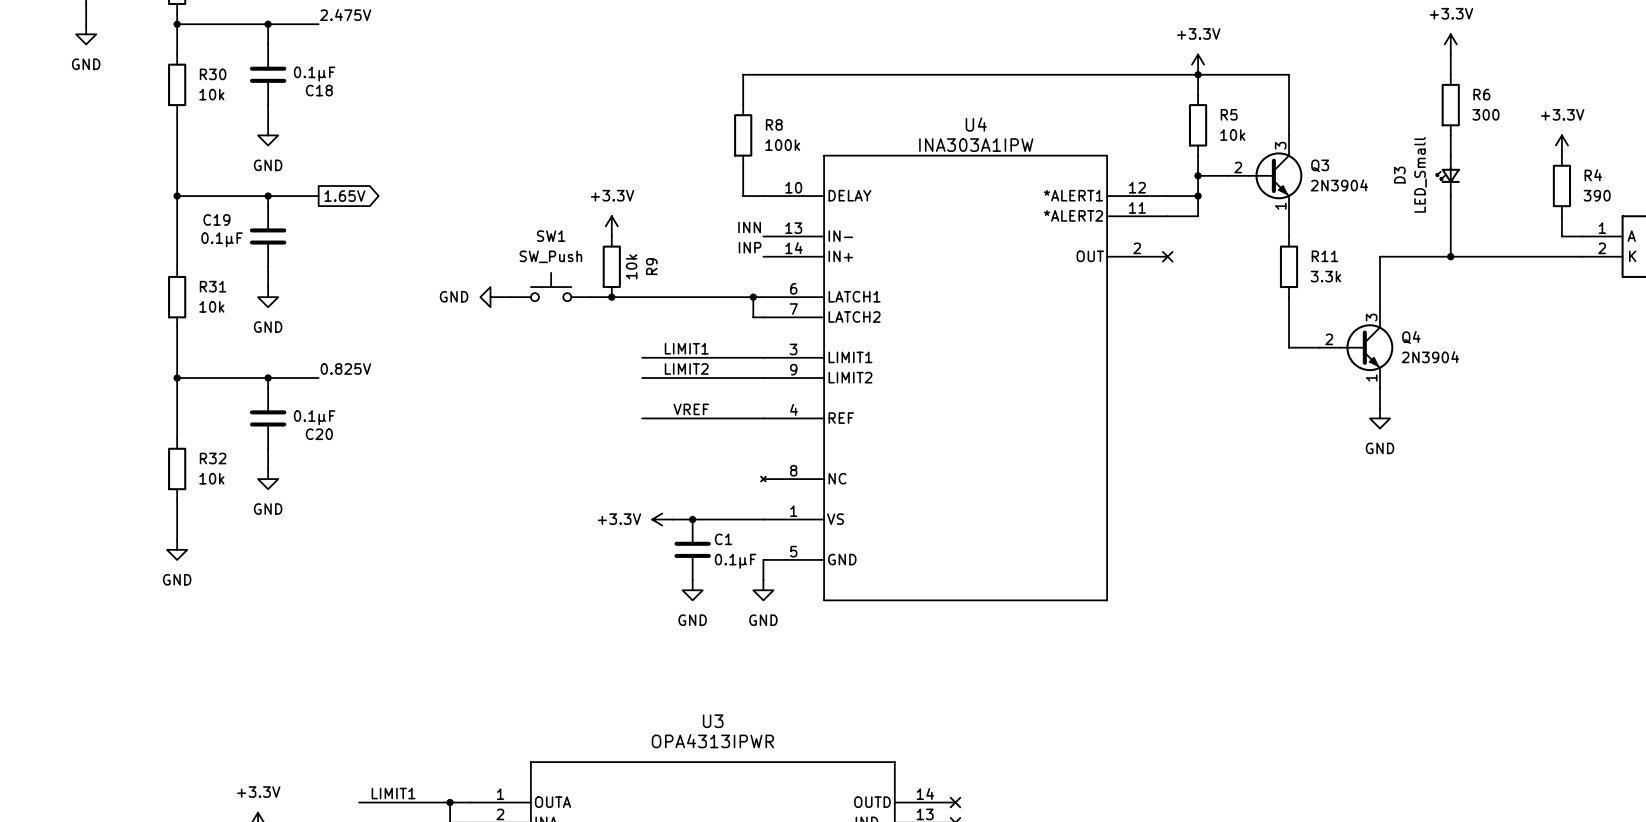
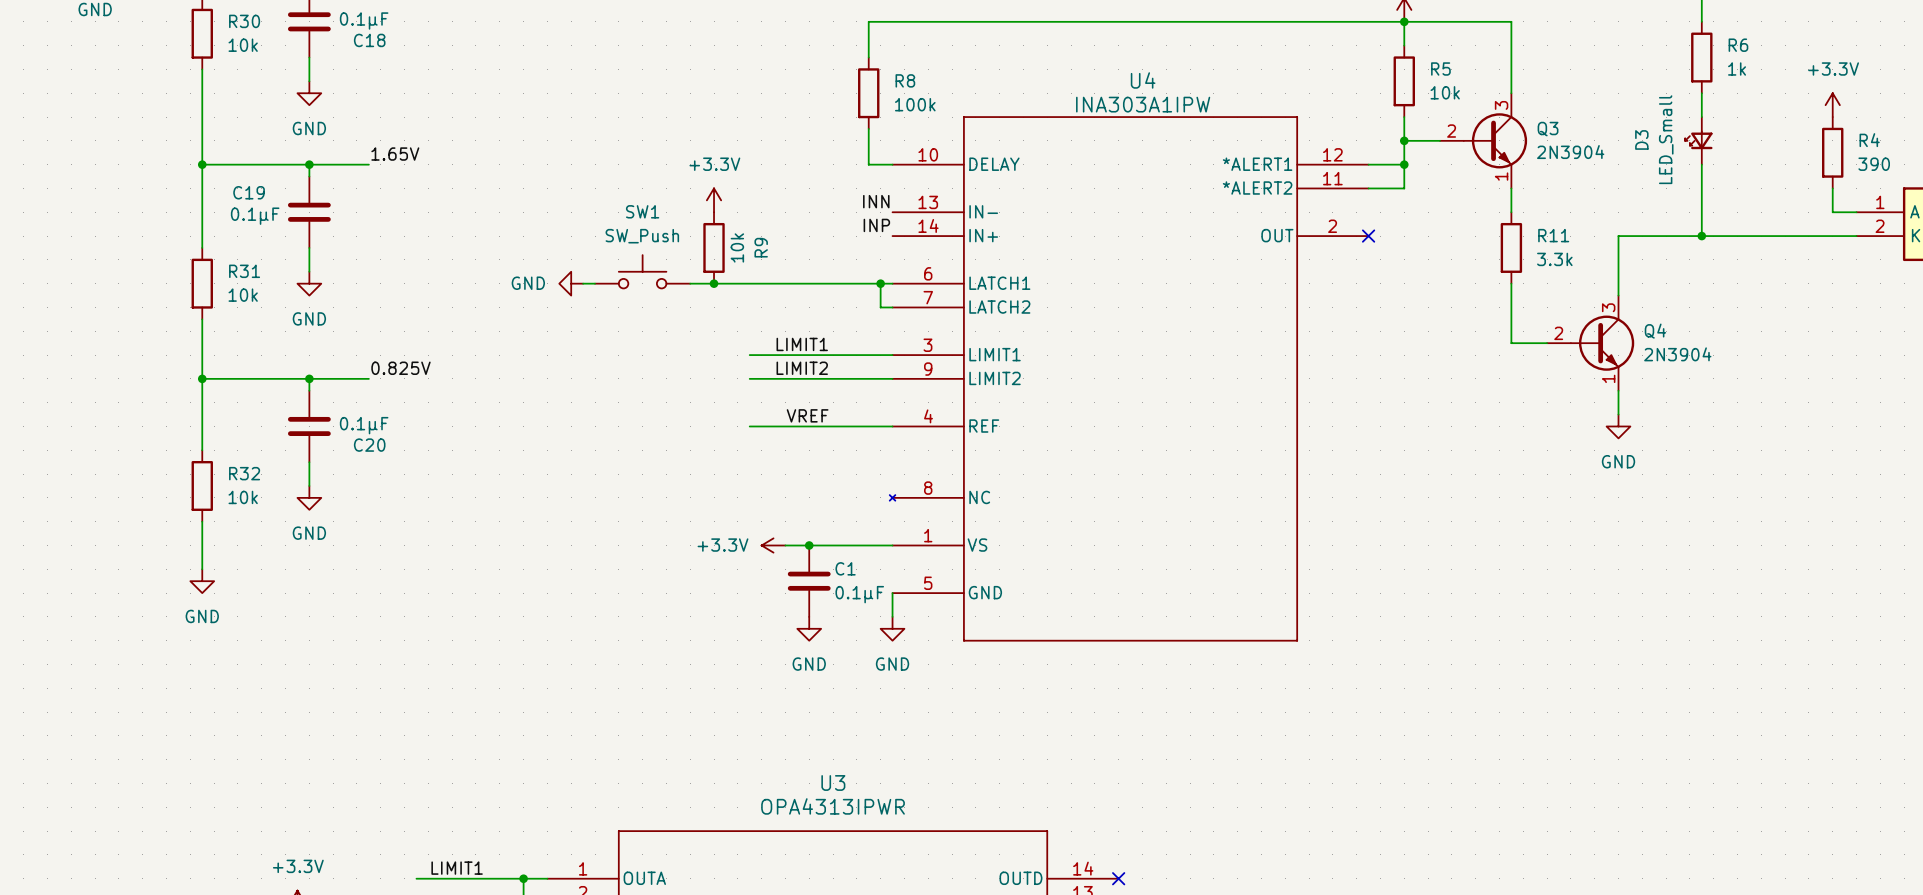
R6 value: 300 (1485, 114) -> 1k (1737, 69)
label: none -> 1.65V (395, 154)
global label: 1.65V (344, 196) -> none

